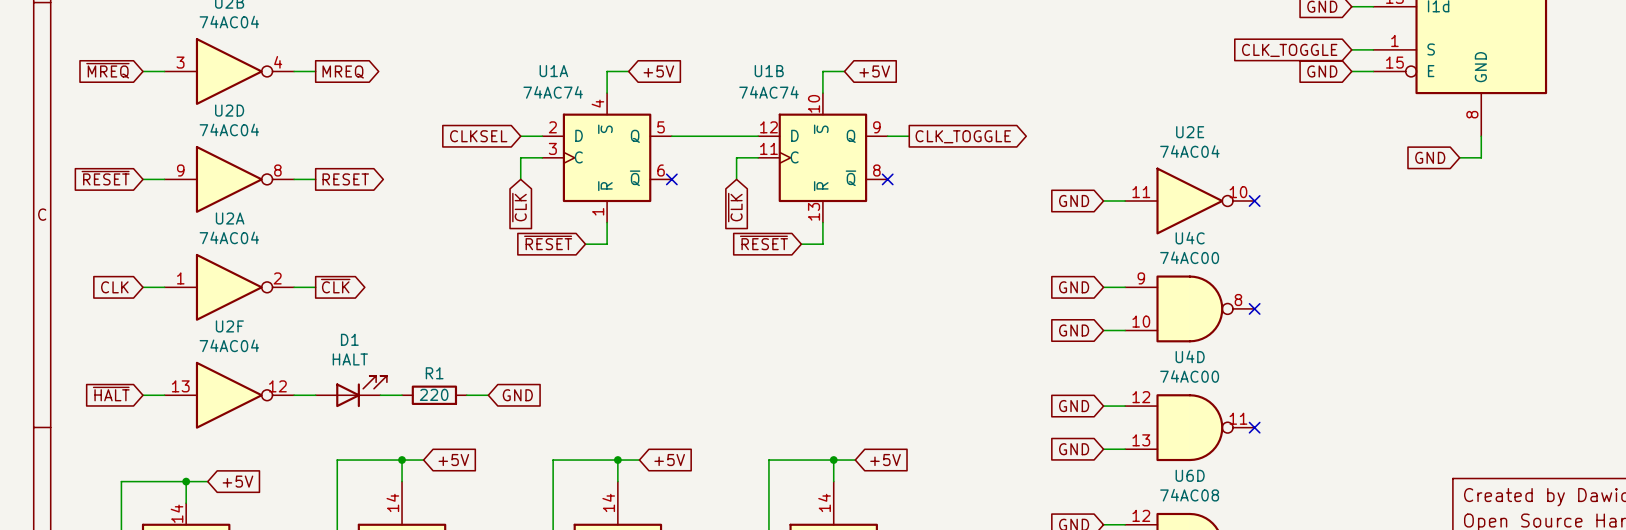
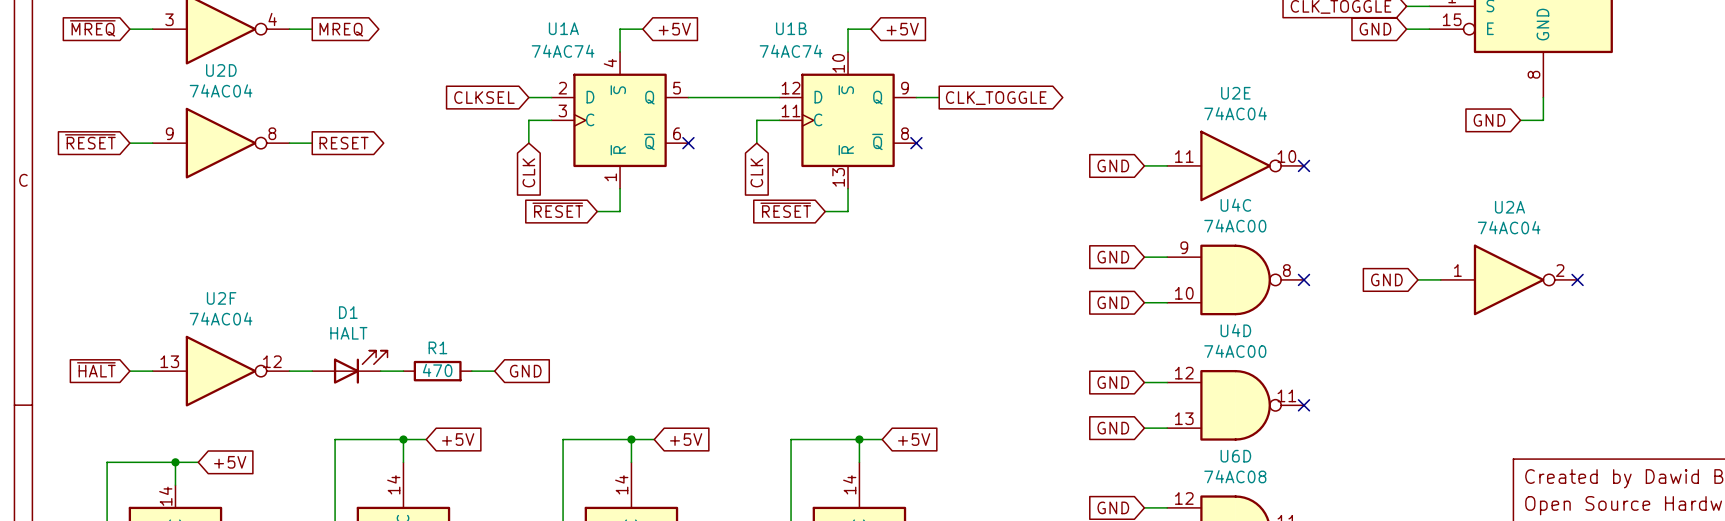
global label: ~{CLK} (519, 207) -> CLK (528, 172)
global label: ~{CLK} (735, 207) -> CLK (756, 172)
global label: ~{CLK} (335, 286) -> none
global label: CLK (114, 287) -> none
wire: (143, 287) (164, 287) -> none
U2A position: (229, 287) -> (1509, 279)
wire: (294, 287) (315, 287) -> none
global label: none -> GND (1386, 279)
wire: none -> (1417, 279) (1440, 279)
no-connect mark: none -> (1577, 279)
R1 value: 220 (434, 394) -> 470 (437, 370)

